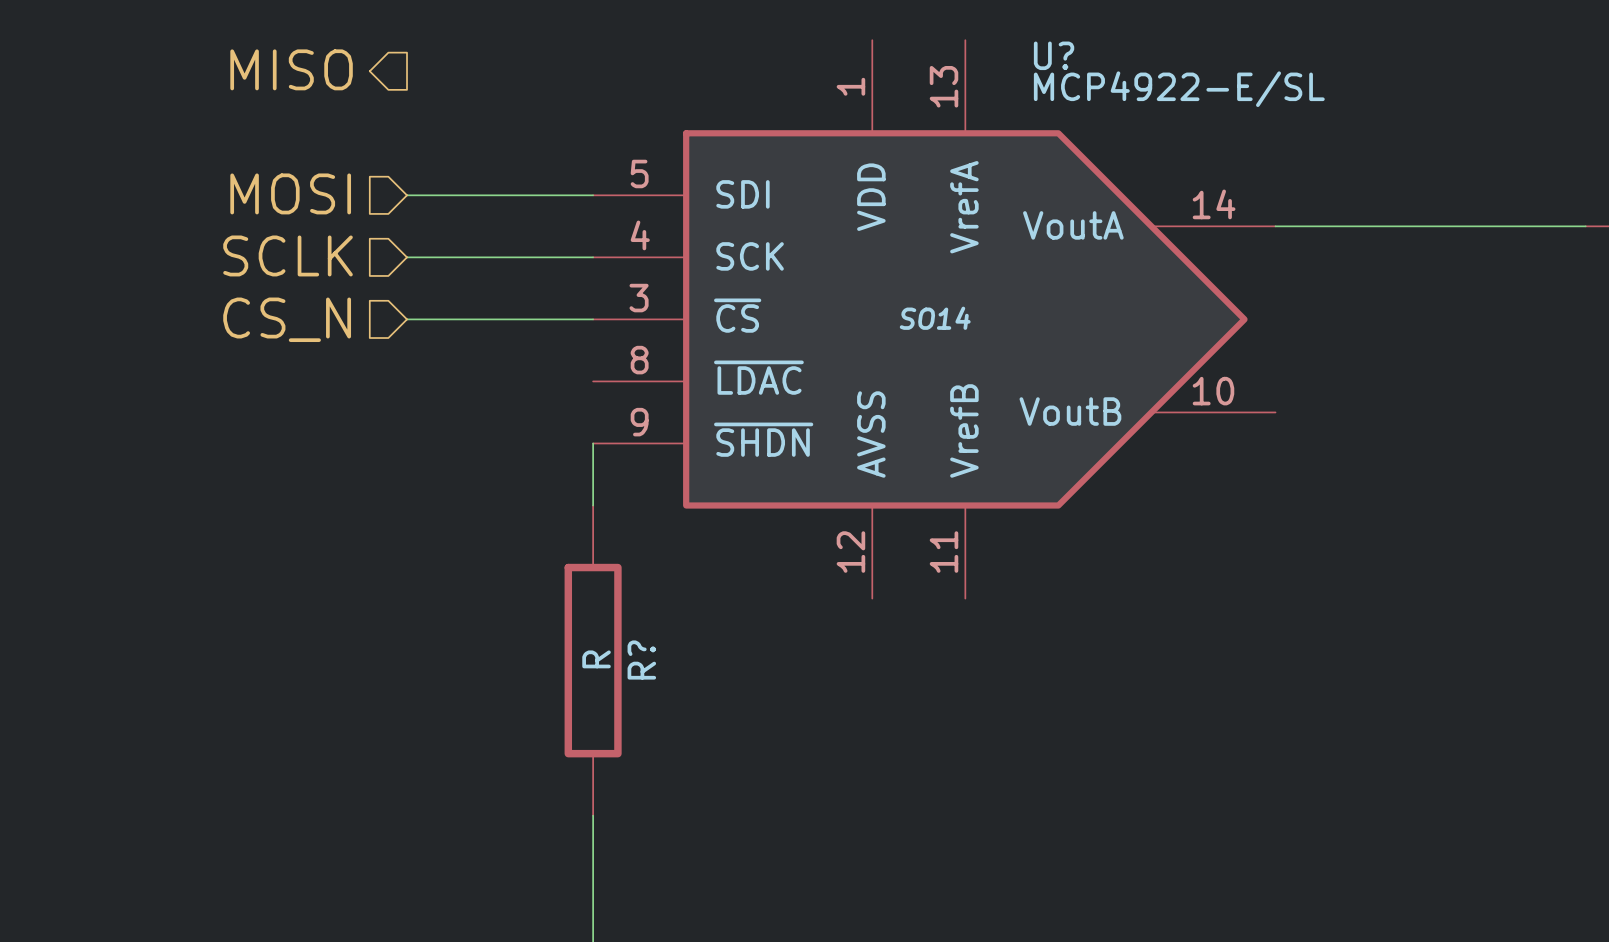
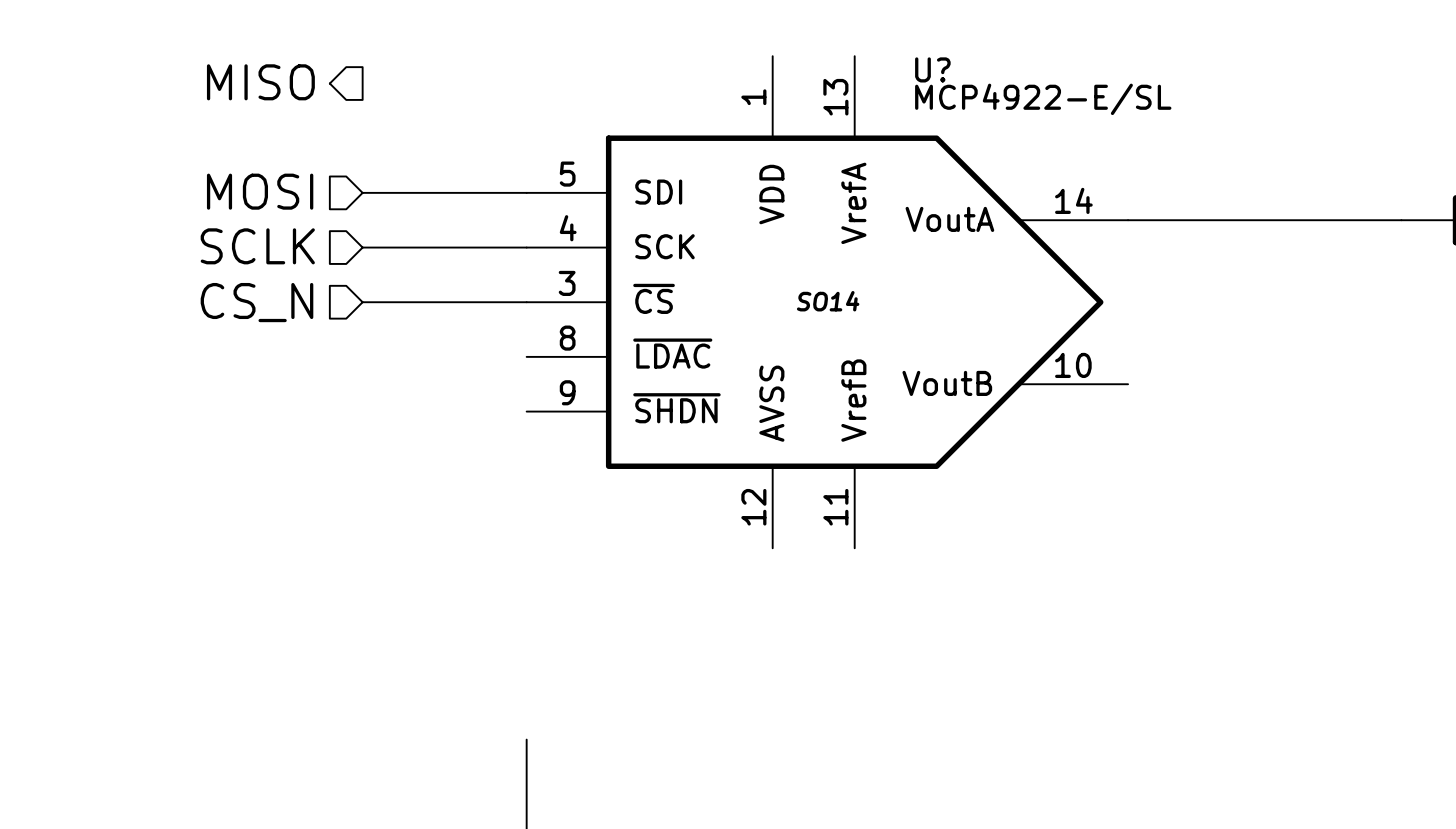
wire: (593, 443) (593, 505) -> none
R?: R (593, 660) -> none

